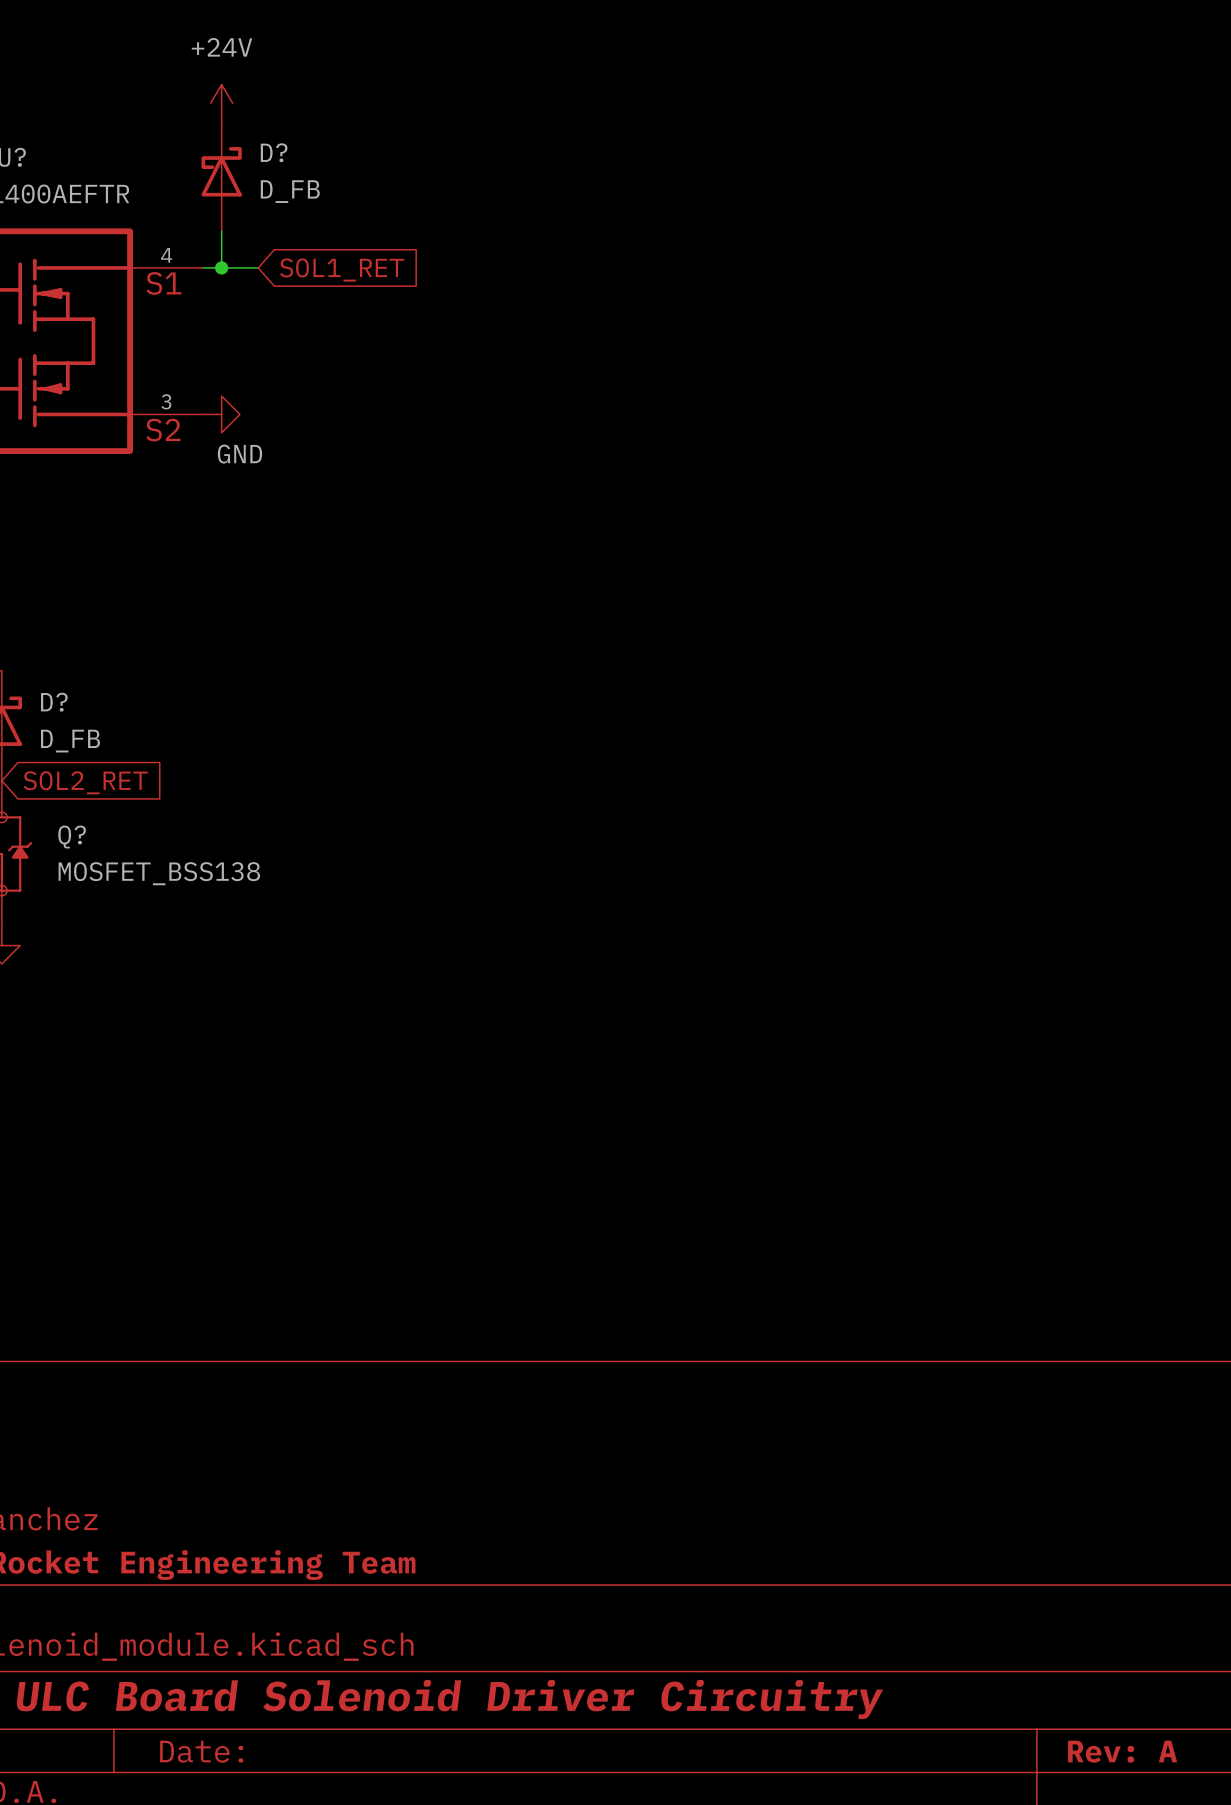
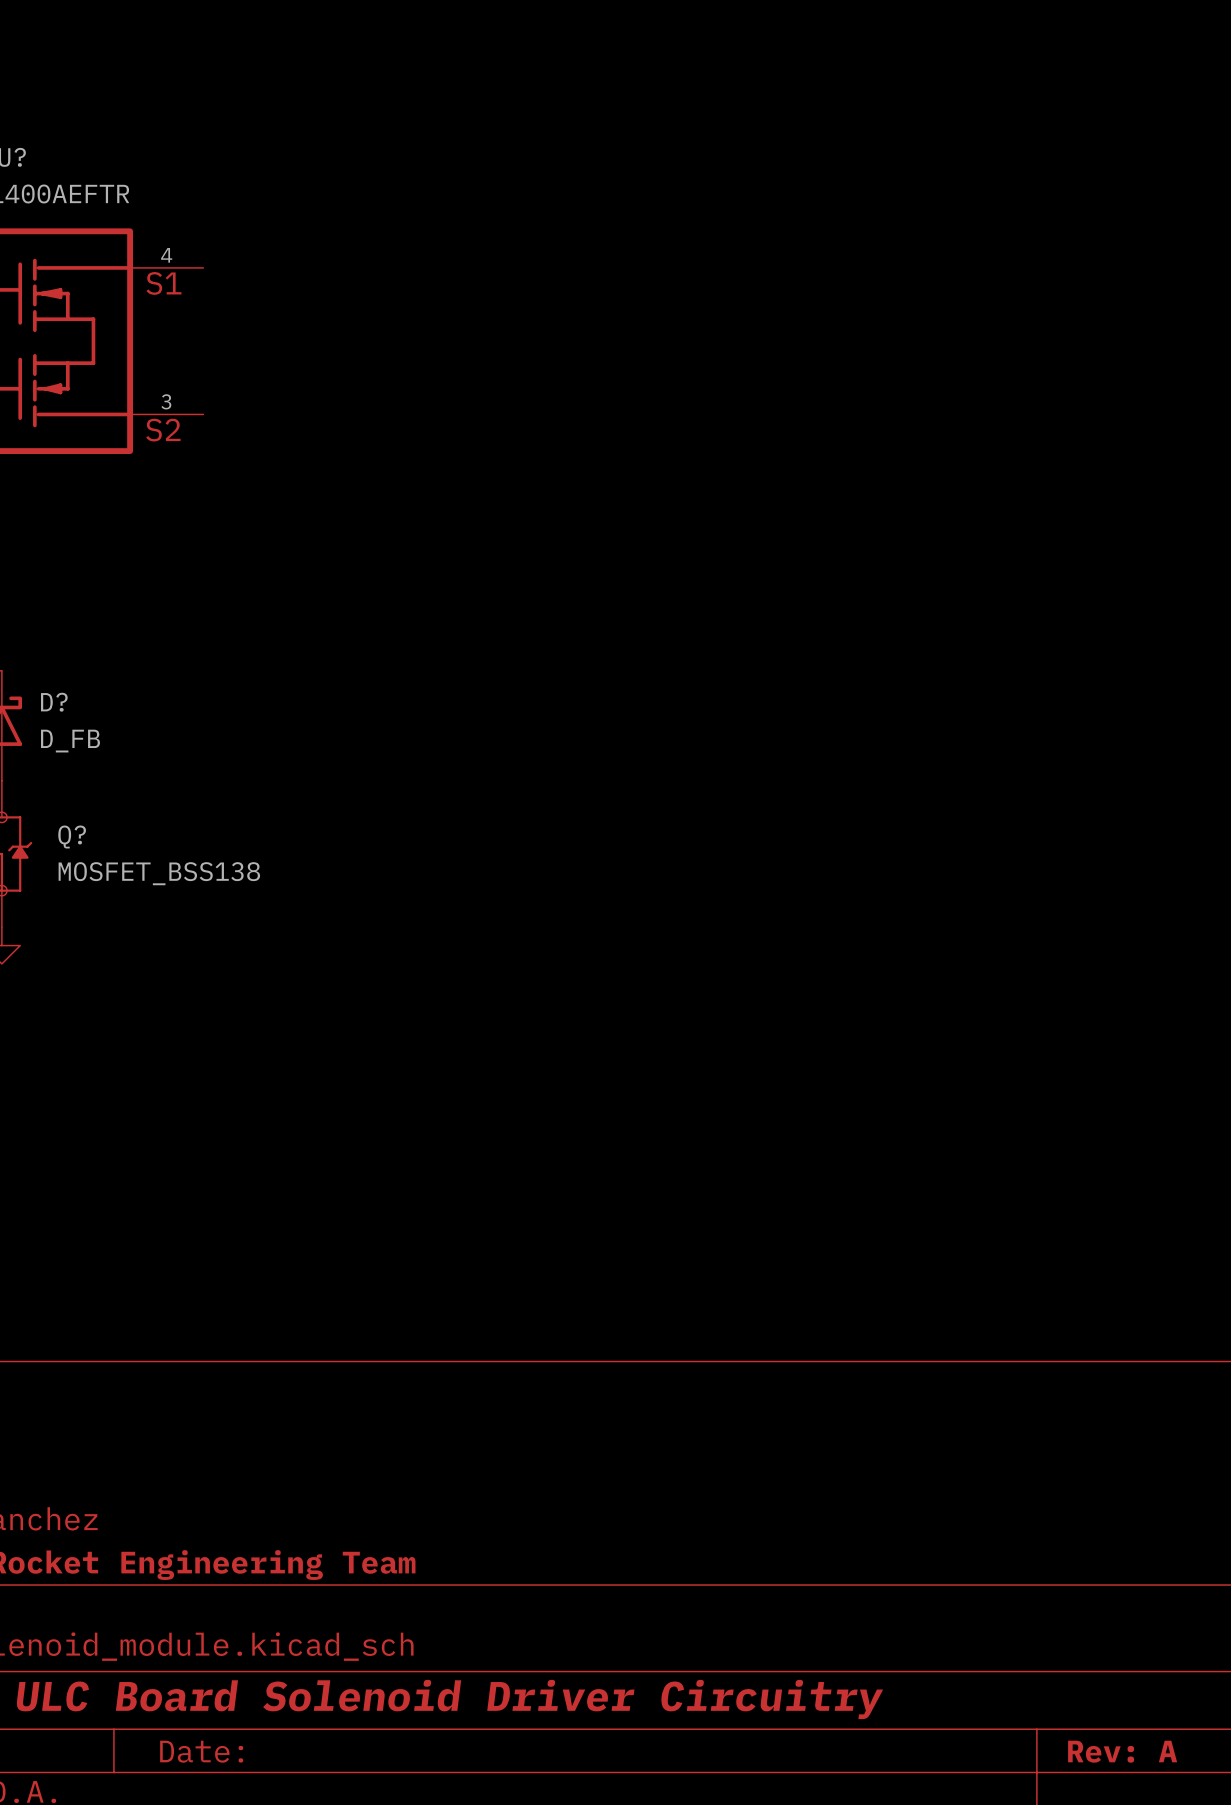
power symbol: +24V (221, 103) -> none
D?: D_FB (221, 176) -> none
wire: (221, 231) (221, 267) -> none
wire: (203, 267) (258, 267) -> none
junction: (221, 267) -> none
global label: SOL1_RET (342, 269) -> none
power symbol: GND (221, 414) -> none
global label: SOL2_RET (85, 782) -> none

